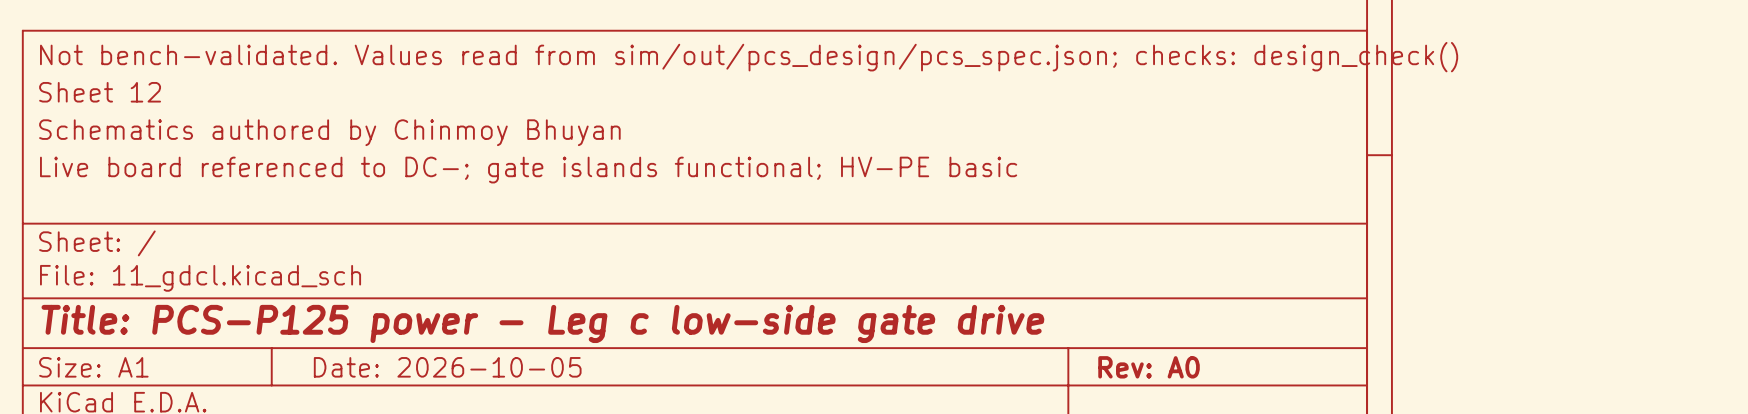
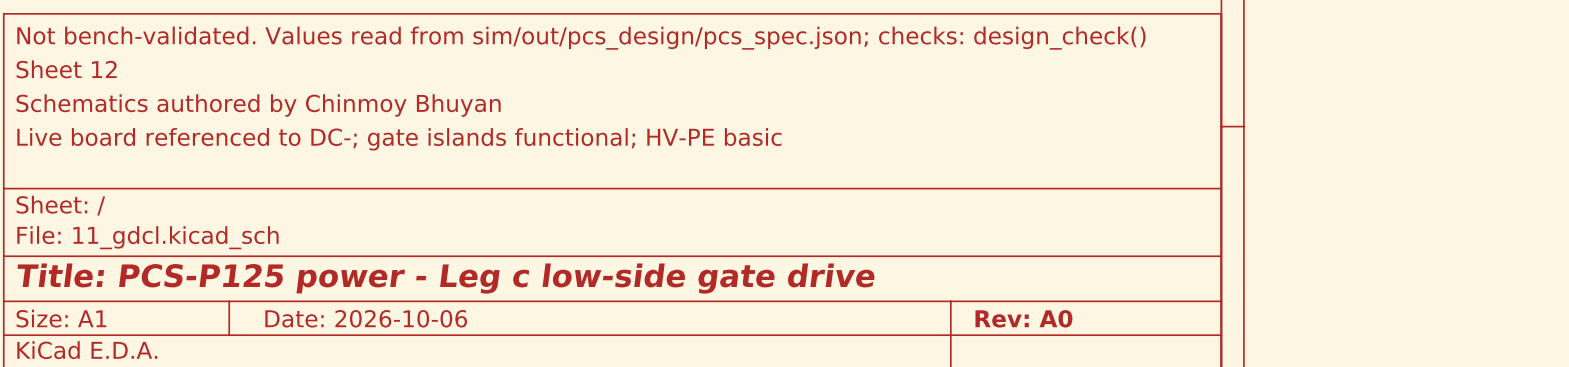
title block: Date: 2026-10-05 (447, 367) -> Date: 2026-10-06 (366, 318)

